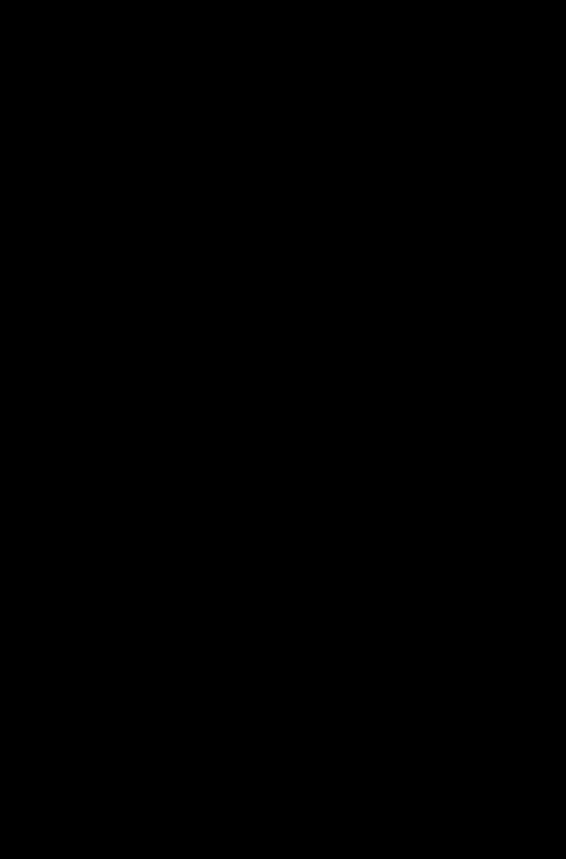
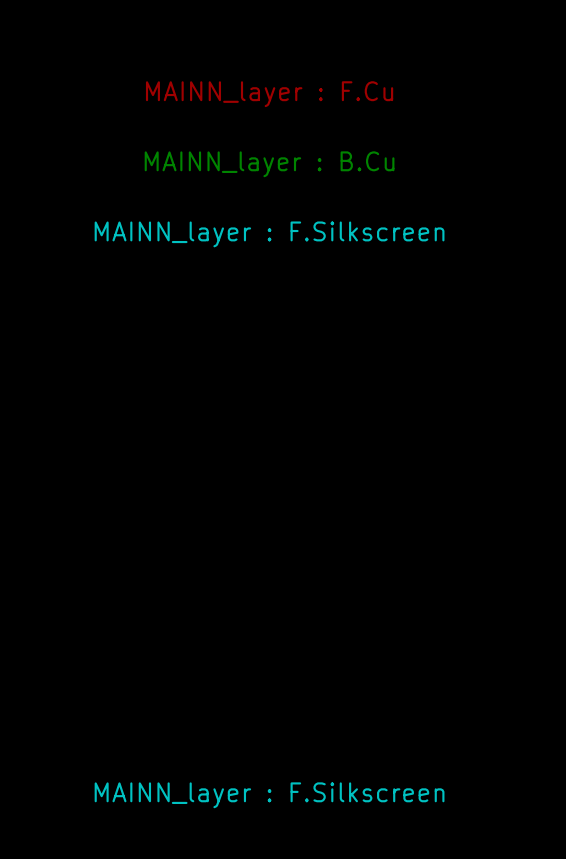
text: none -> MAINN_layer : F.Cu (269, 94)
text: none -> MAINN_layer : B.Cu (269, 164)
text: none -> MAINN_layer : F.Silkscreen (269, 234)
text: none -> MAINN_layer : F.Silkscreen (269, 795)

